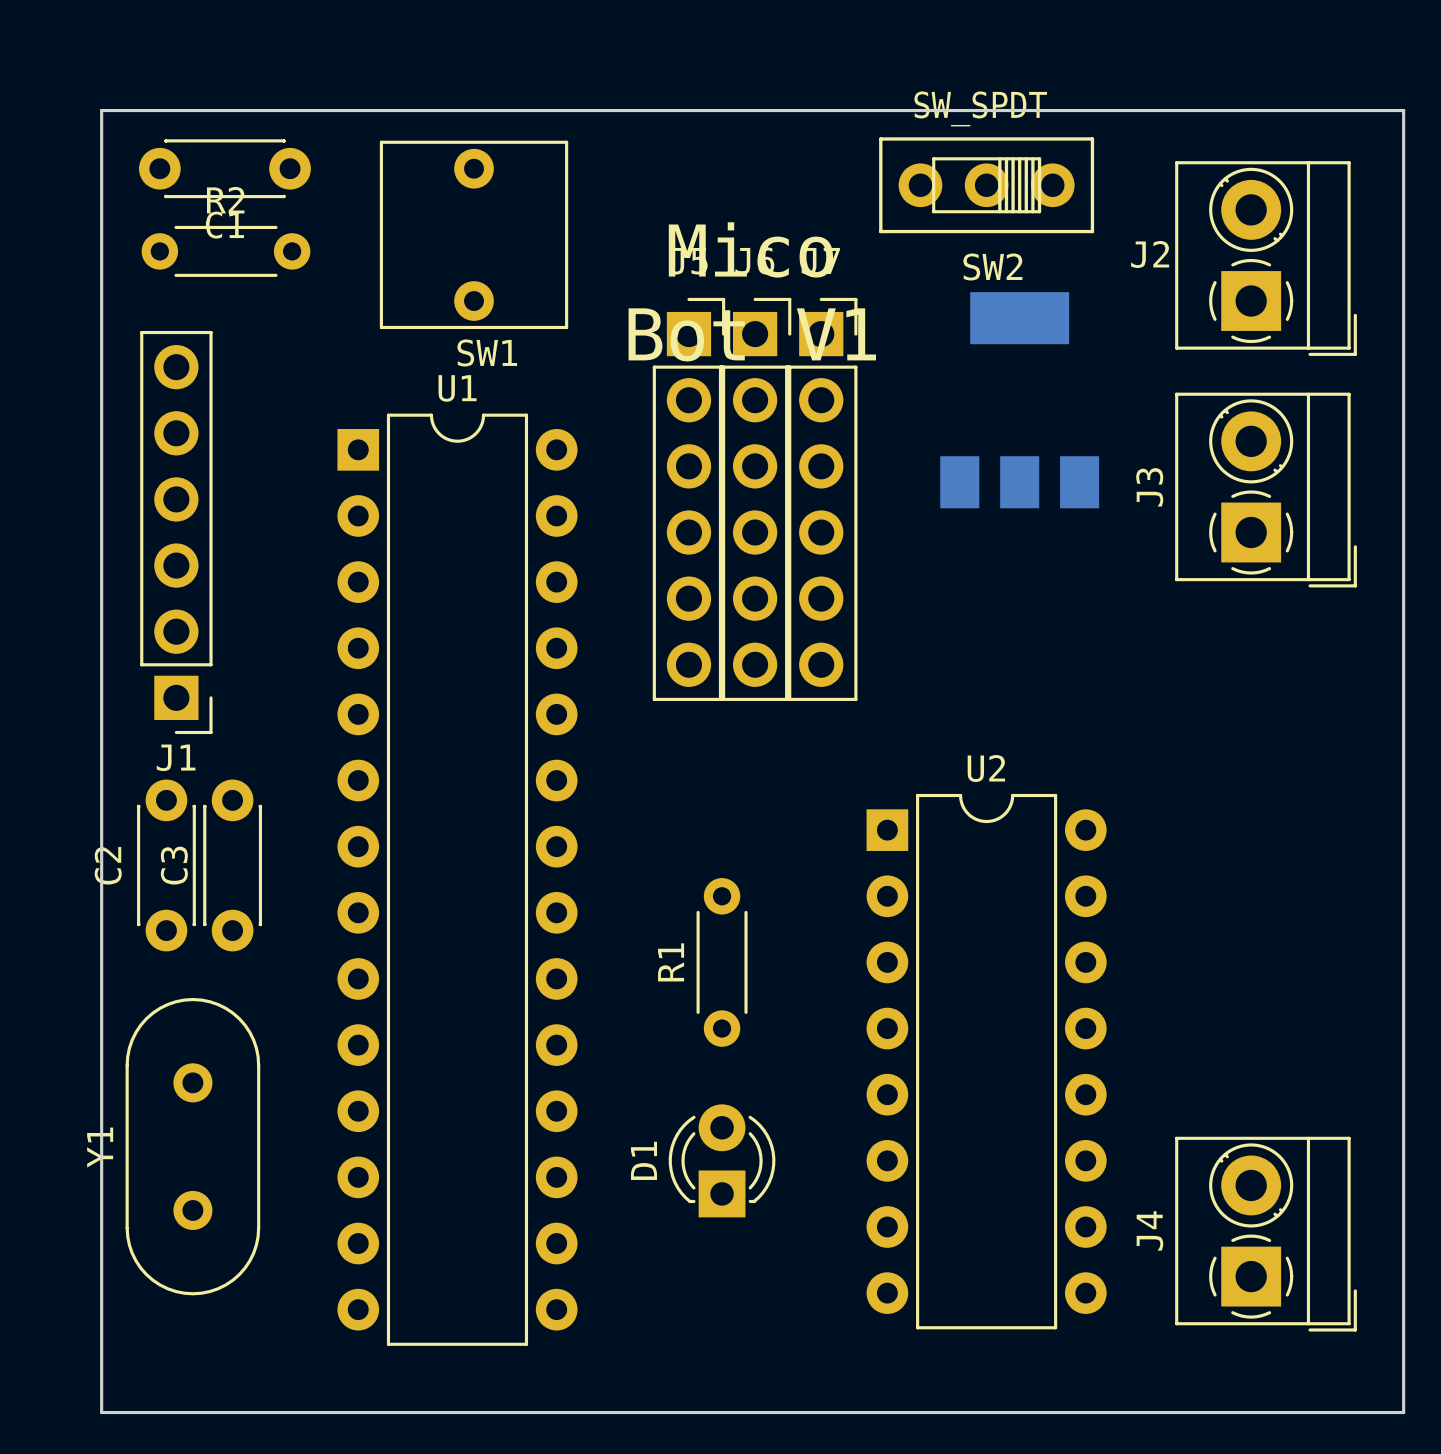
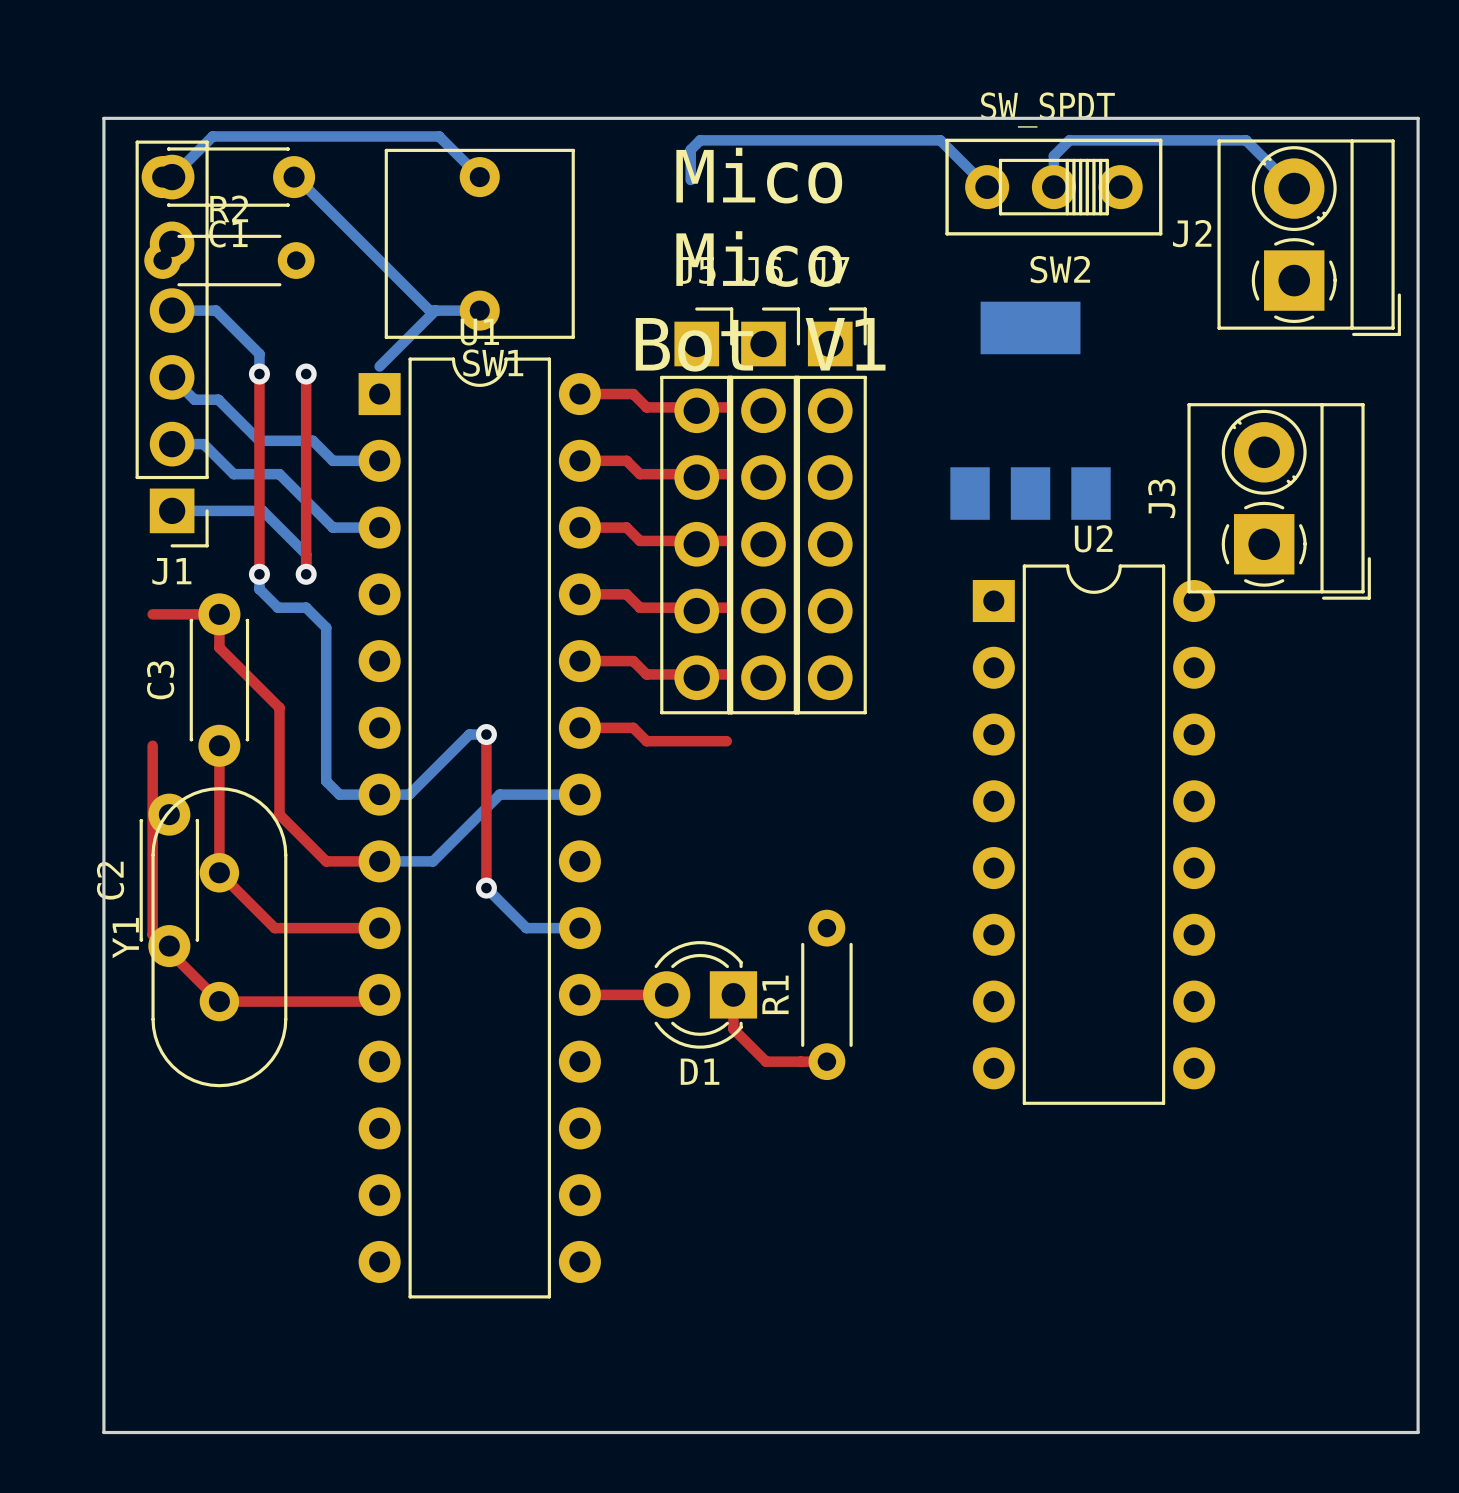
text: none -> Mico (759, 175)
bottom track: none -> (172, 177) (212, 136) (439, 136) (479, 177)
bottom track: none -> (690, 180) (690, 149) (700, 140) (940, 140) (987, 187)
bottom track: none -> (306, 187) (429, 310) (479, 310)
bottom track: none -> (1053, 187) (1053, 155) (1069, 140) (1246, 140) (1294, 188)
SW2 position: (986, 185) -> (1053, 187)
J2 position: (1266, 258) -> (1309, 237)
bottom track: none -> (172, 310) (216, 310) (259, 354) (259, 374)
bottom track: none -> (435, 310) (379, 366) (379, 364)
top track: none -> (259, 374) (259, 574)
via: none -> (259, 374)
top track: none -> (306, 374) (306, 574)
via: none -> (306, 374)
bottom track: none -> (172, 377) (194, 399) (218, 399) (259, 440) (312, 440) (332, 460) (379, 460)
top track: none -> (579, 394) (633, 394) (646, 407) (726, 407)
bottom track: none -> (172, 444) (203, 444) (233, 474) (279, 474) (332, 527) (379, 527)
top track: none -> (579, 460) (626, 460) (639, 474) (726, 474)
bottom track: none -> (172, 510) (262, 510) (306, 554) (306, 574)
top track: none -> (579, 527) (626, 527) (639, 540) (726, 540)
J1 position: (176, 532) -> (172, 343)
bottom track: none -> (259, 574) (259, 589) (277, 607) (306, 607) (326, 627) (326, 781) (339, 794) (409, 794) (469, 734) (486, 734)
via: none -> (259, 574)
via: none -> (306, 574)
top track: none -> (579, 594) (626, 594) (639, 607) (726, 607)
top track: none -> (152, 614) (219, 614) (219, 647) (279, 707) (279, 814) (326, 861) (379, 861)
top track: none -> (579, 661) (633, 661) (646, 674) (726, 674)
top track: none -> (579, 727) (633, 727) (646, 741) (726, 741)
top track: none -> (486, 734) (486, 888)
via: none -> (486, 734)
top track: none -> (152, 745) (152, 934) (219, 1001) (372, 1001) (379, 994)
top track: none -> (219, 745) (219, 872) (274, 928) (379, 928)
bottom track: none -> (579, 794) (499, 794) (433, 861) (379, 861)
C3 position: (232, 865) -> (219, 680)
bottom track: none -> (486, 888) (526, 928) (579, 928)
via: none -> (486, 888)
U1 position: (457, 879) -> (479, 827)
R1 position: (722, 962) -> (826, 994)
top track: none -> (579, 994) (666, 994)
top track: none -> (733, 994) (733, 1029) (766, 1061) (826, 1061)
U2 position: (986, 1061) -> (1093, 834)
D1 footprint: [668, 1104, 776, 1218] -> [643, 941, 758, 1049]
Y1 position: (192, 1146) -> (219, 937)
D1 name position: D1 (643, 1160) -> D1 (700, 1071)
J4: (1266, 1234) -> none

